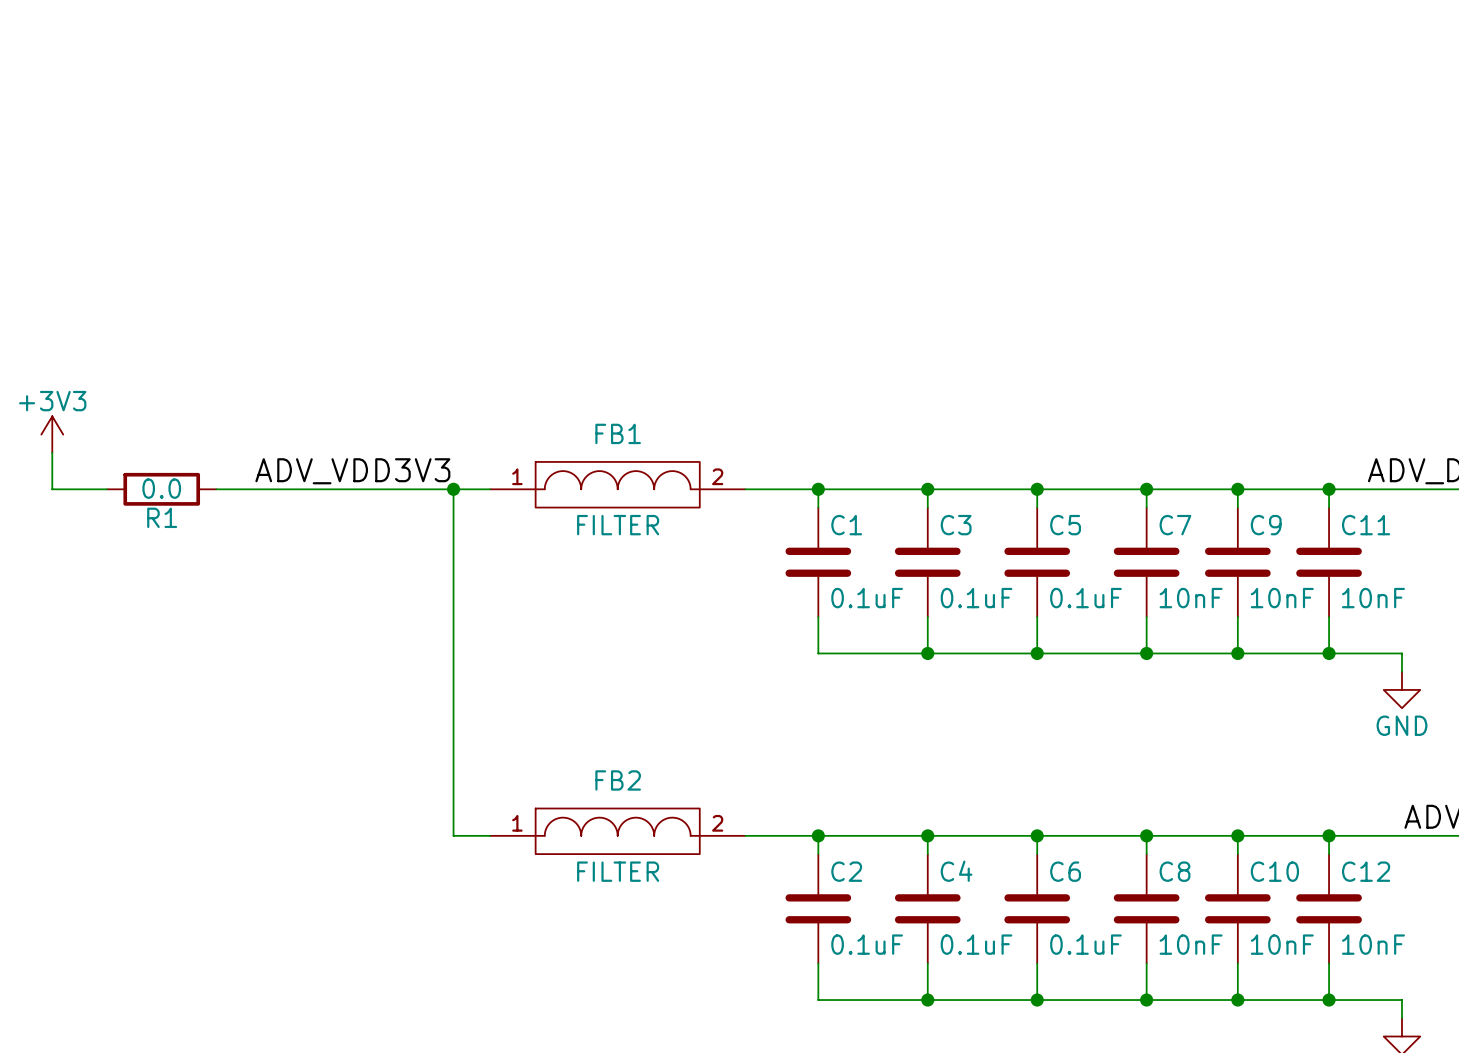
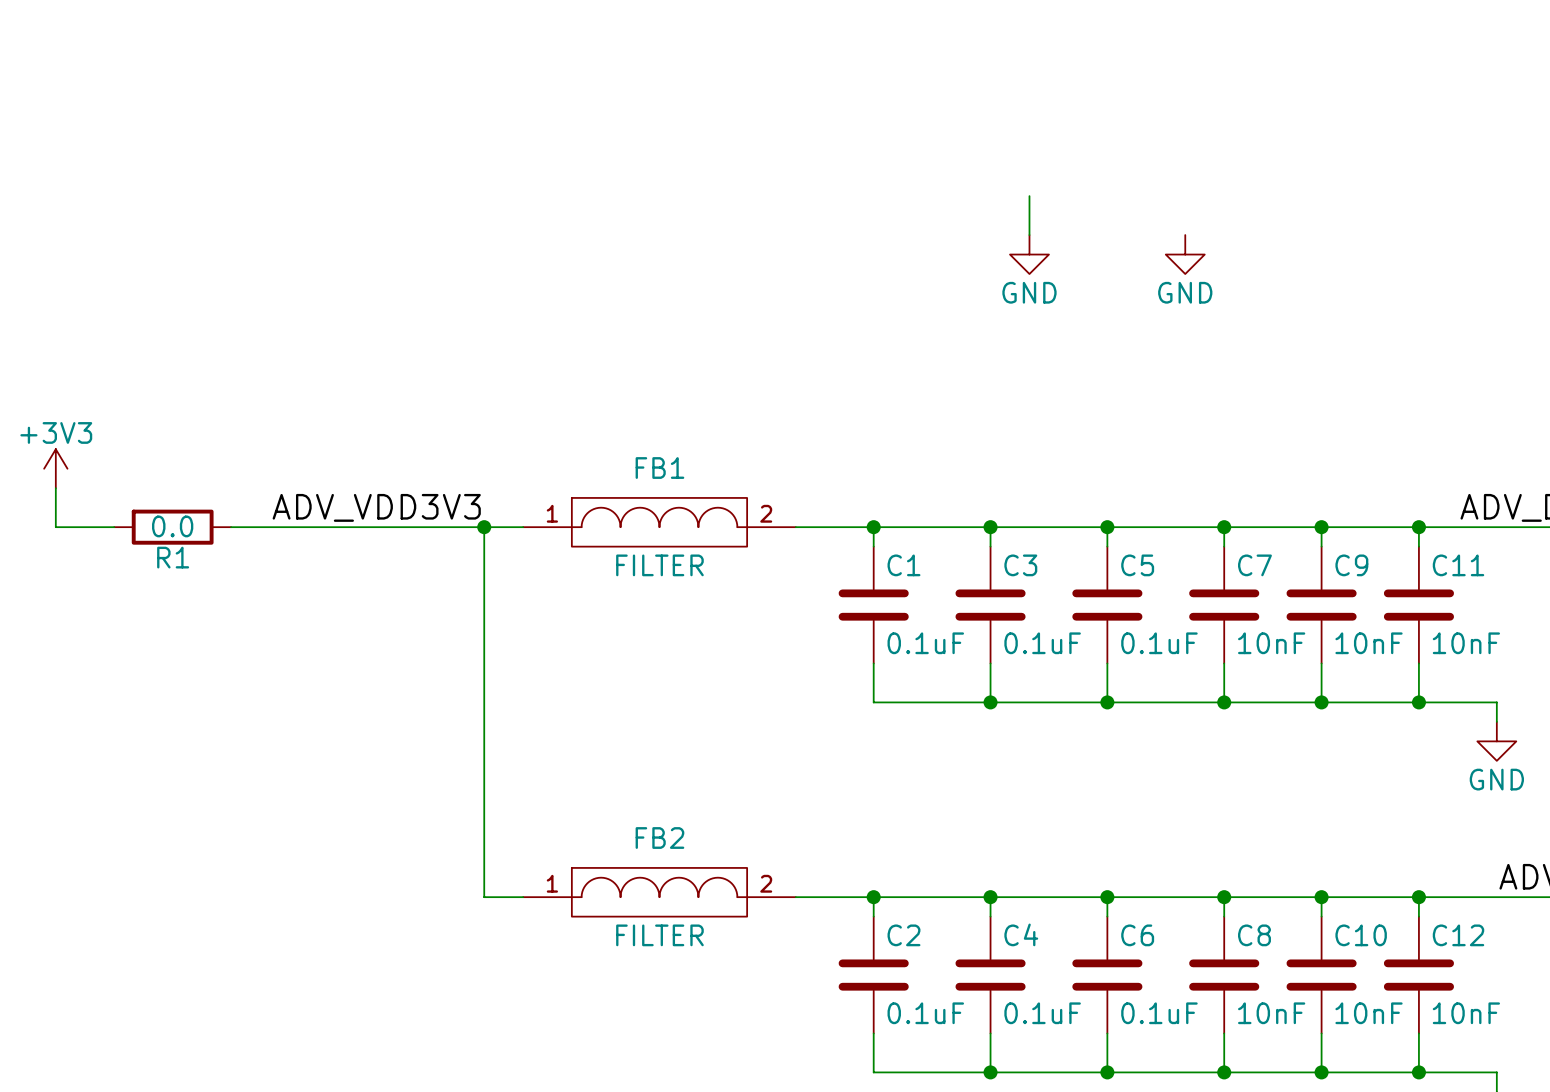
wire: none -> (1029, 196) (1029, 235)
power symbol: none -> GND (1029, 254)
power symbol: none -> GND (1185, 254)

